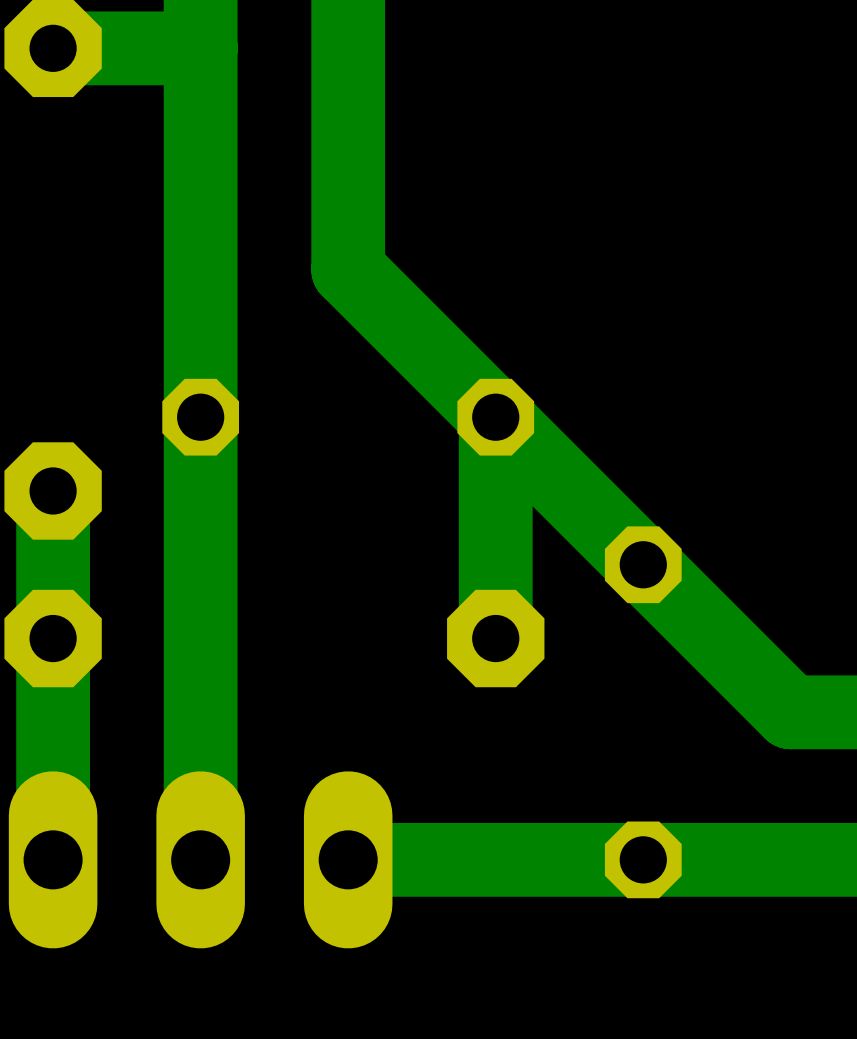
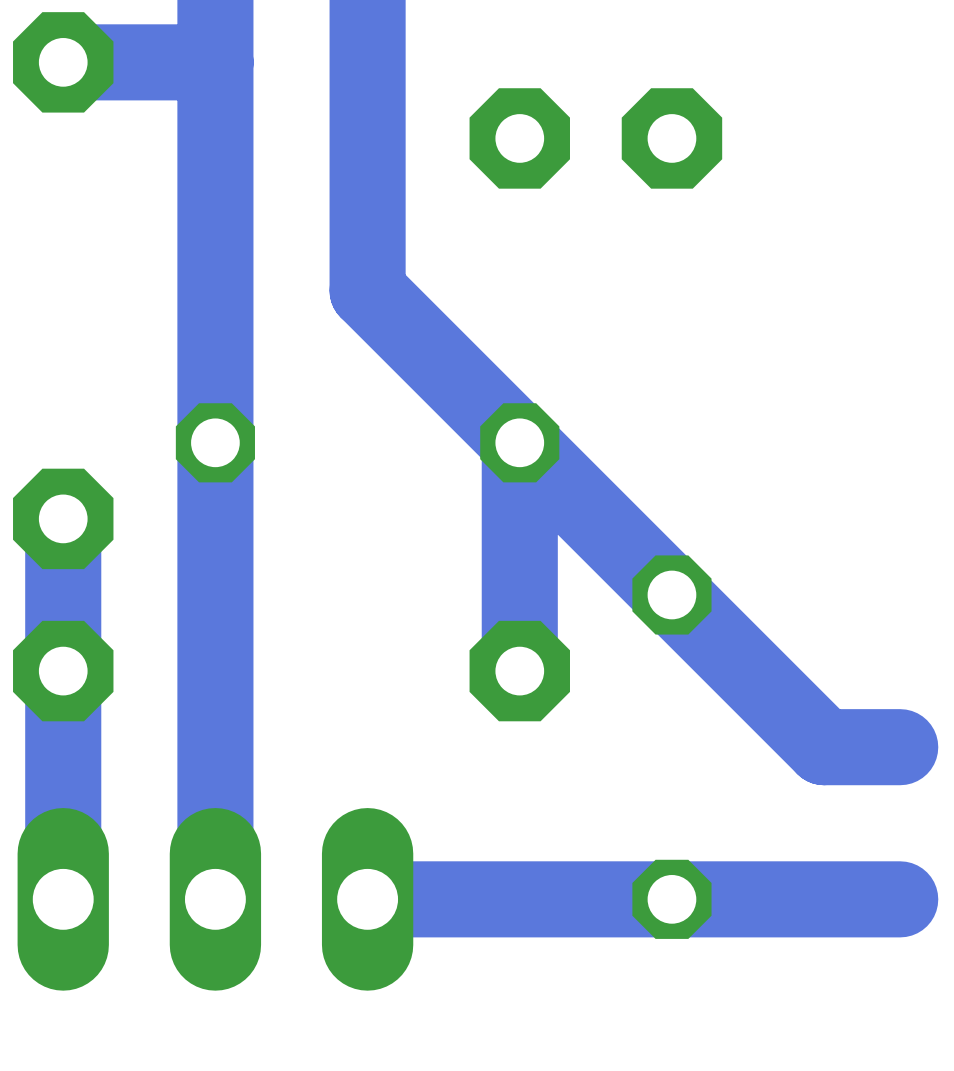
part: none -> (595, 138)

